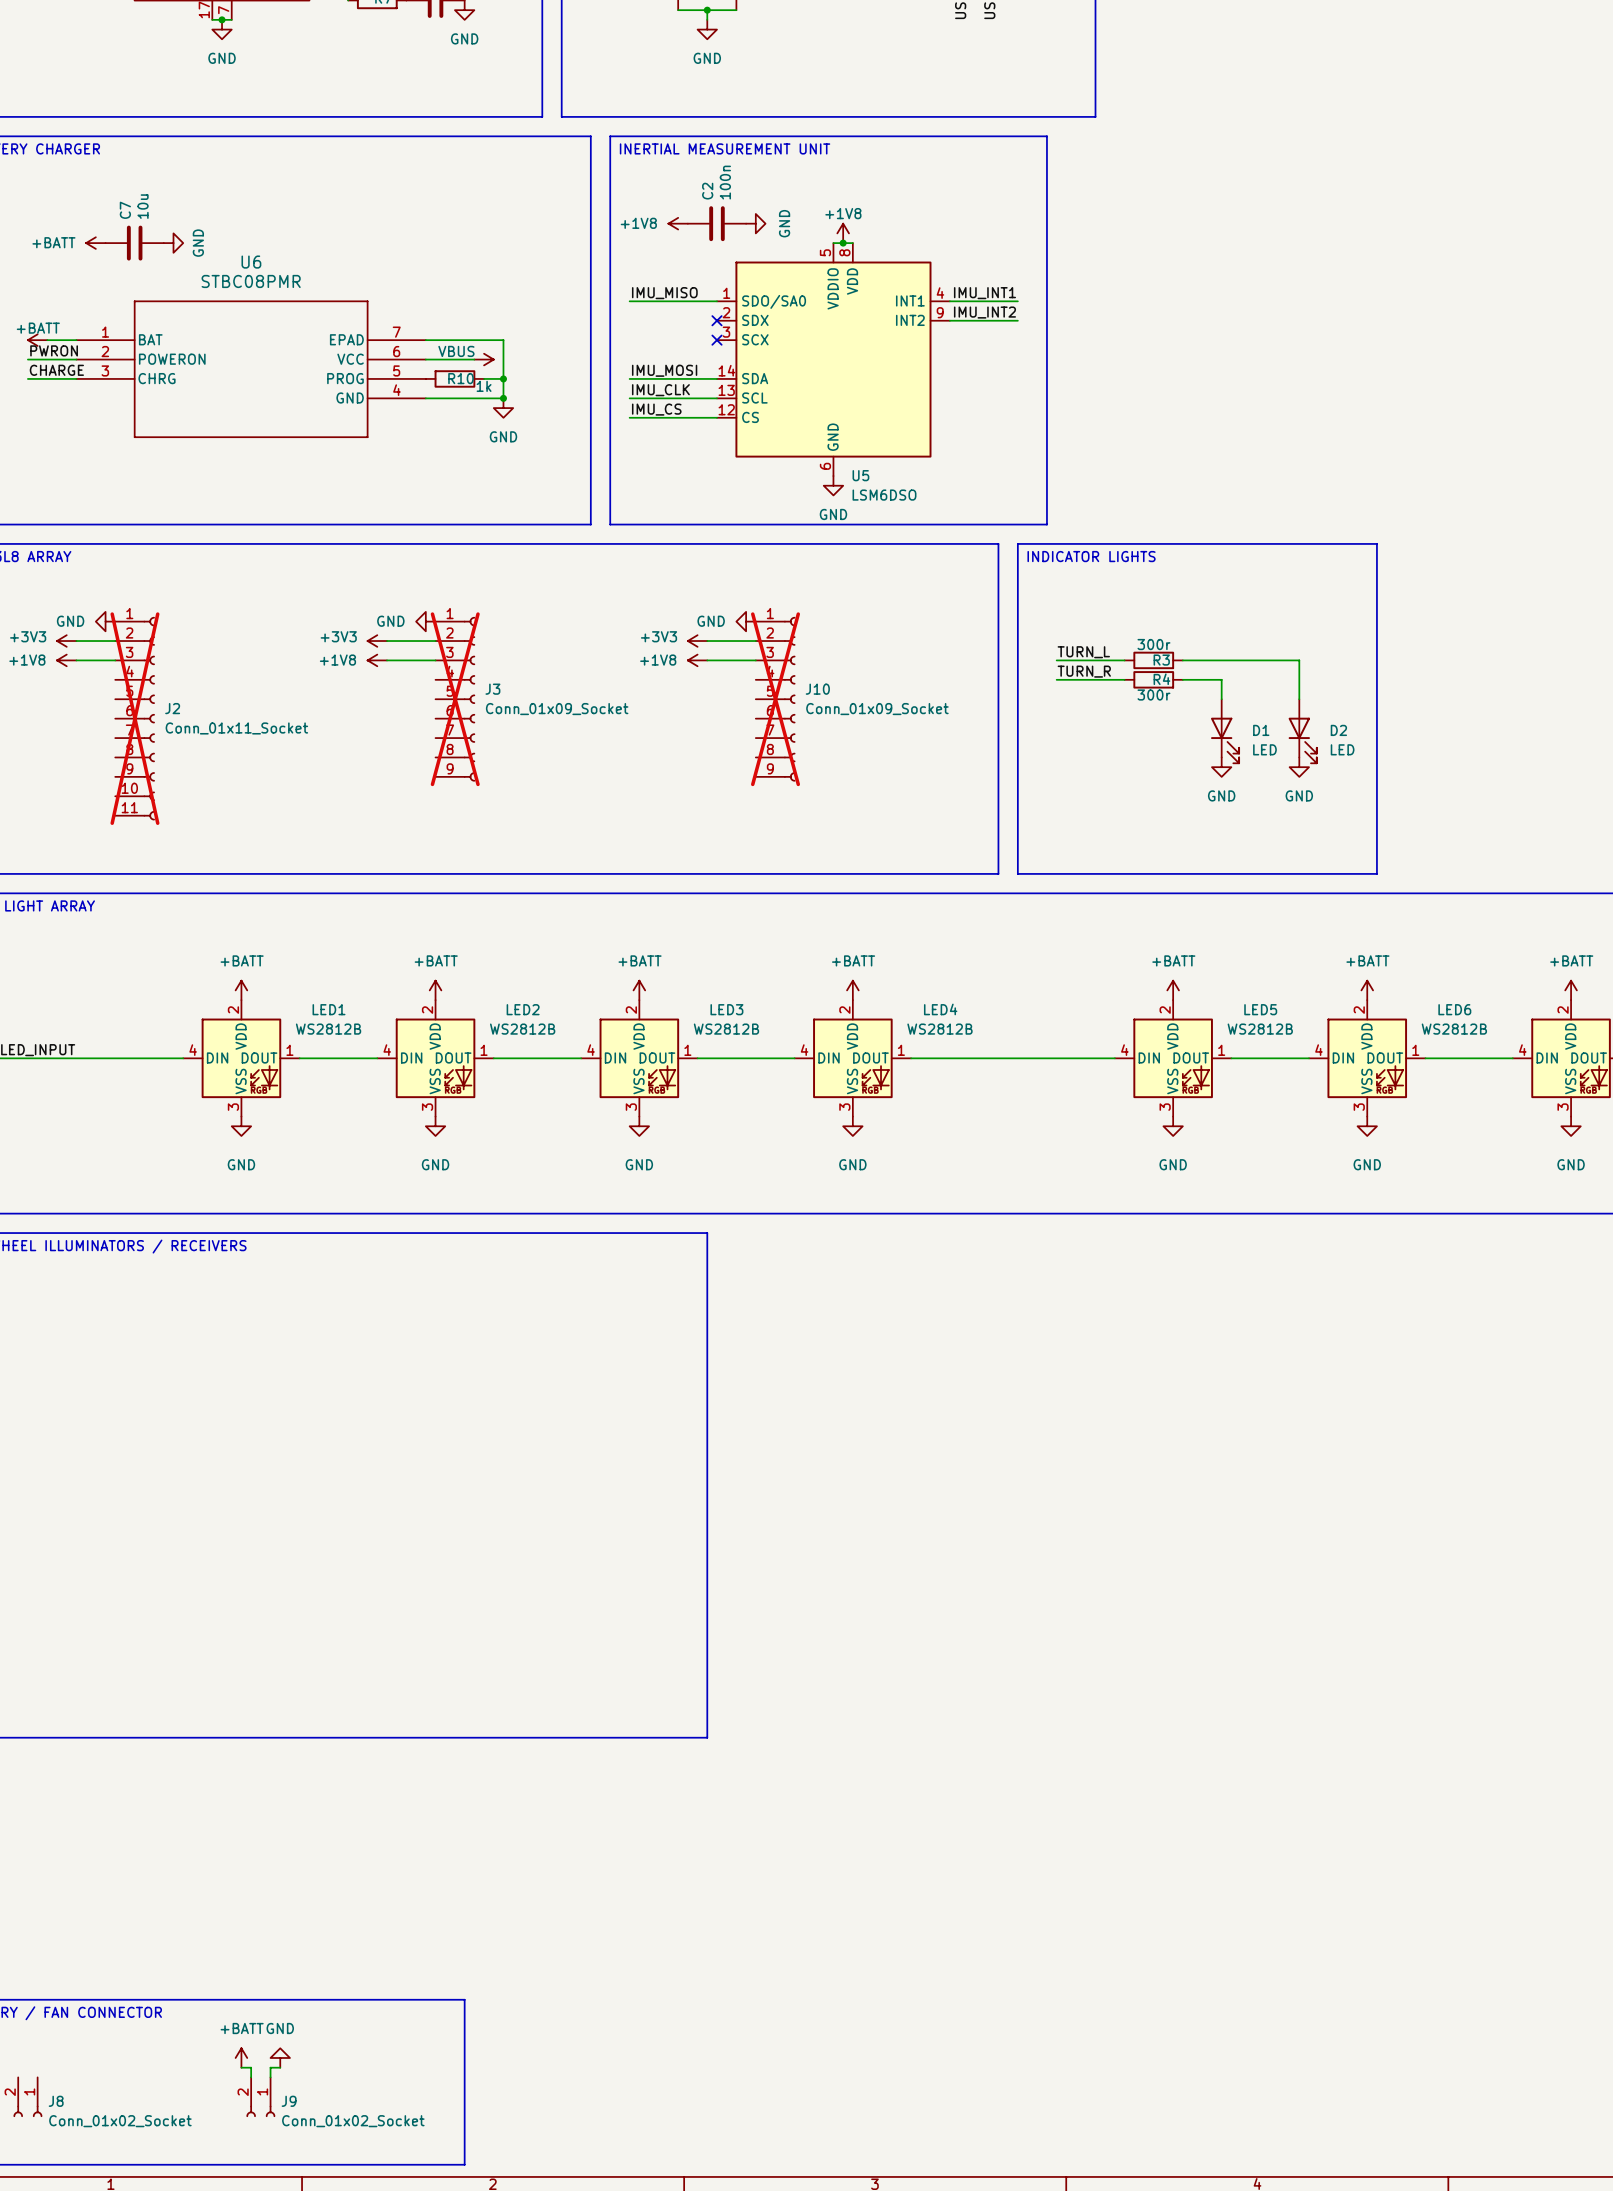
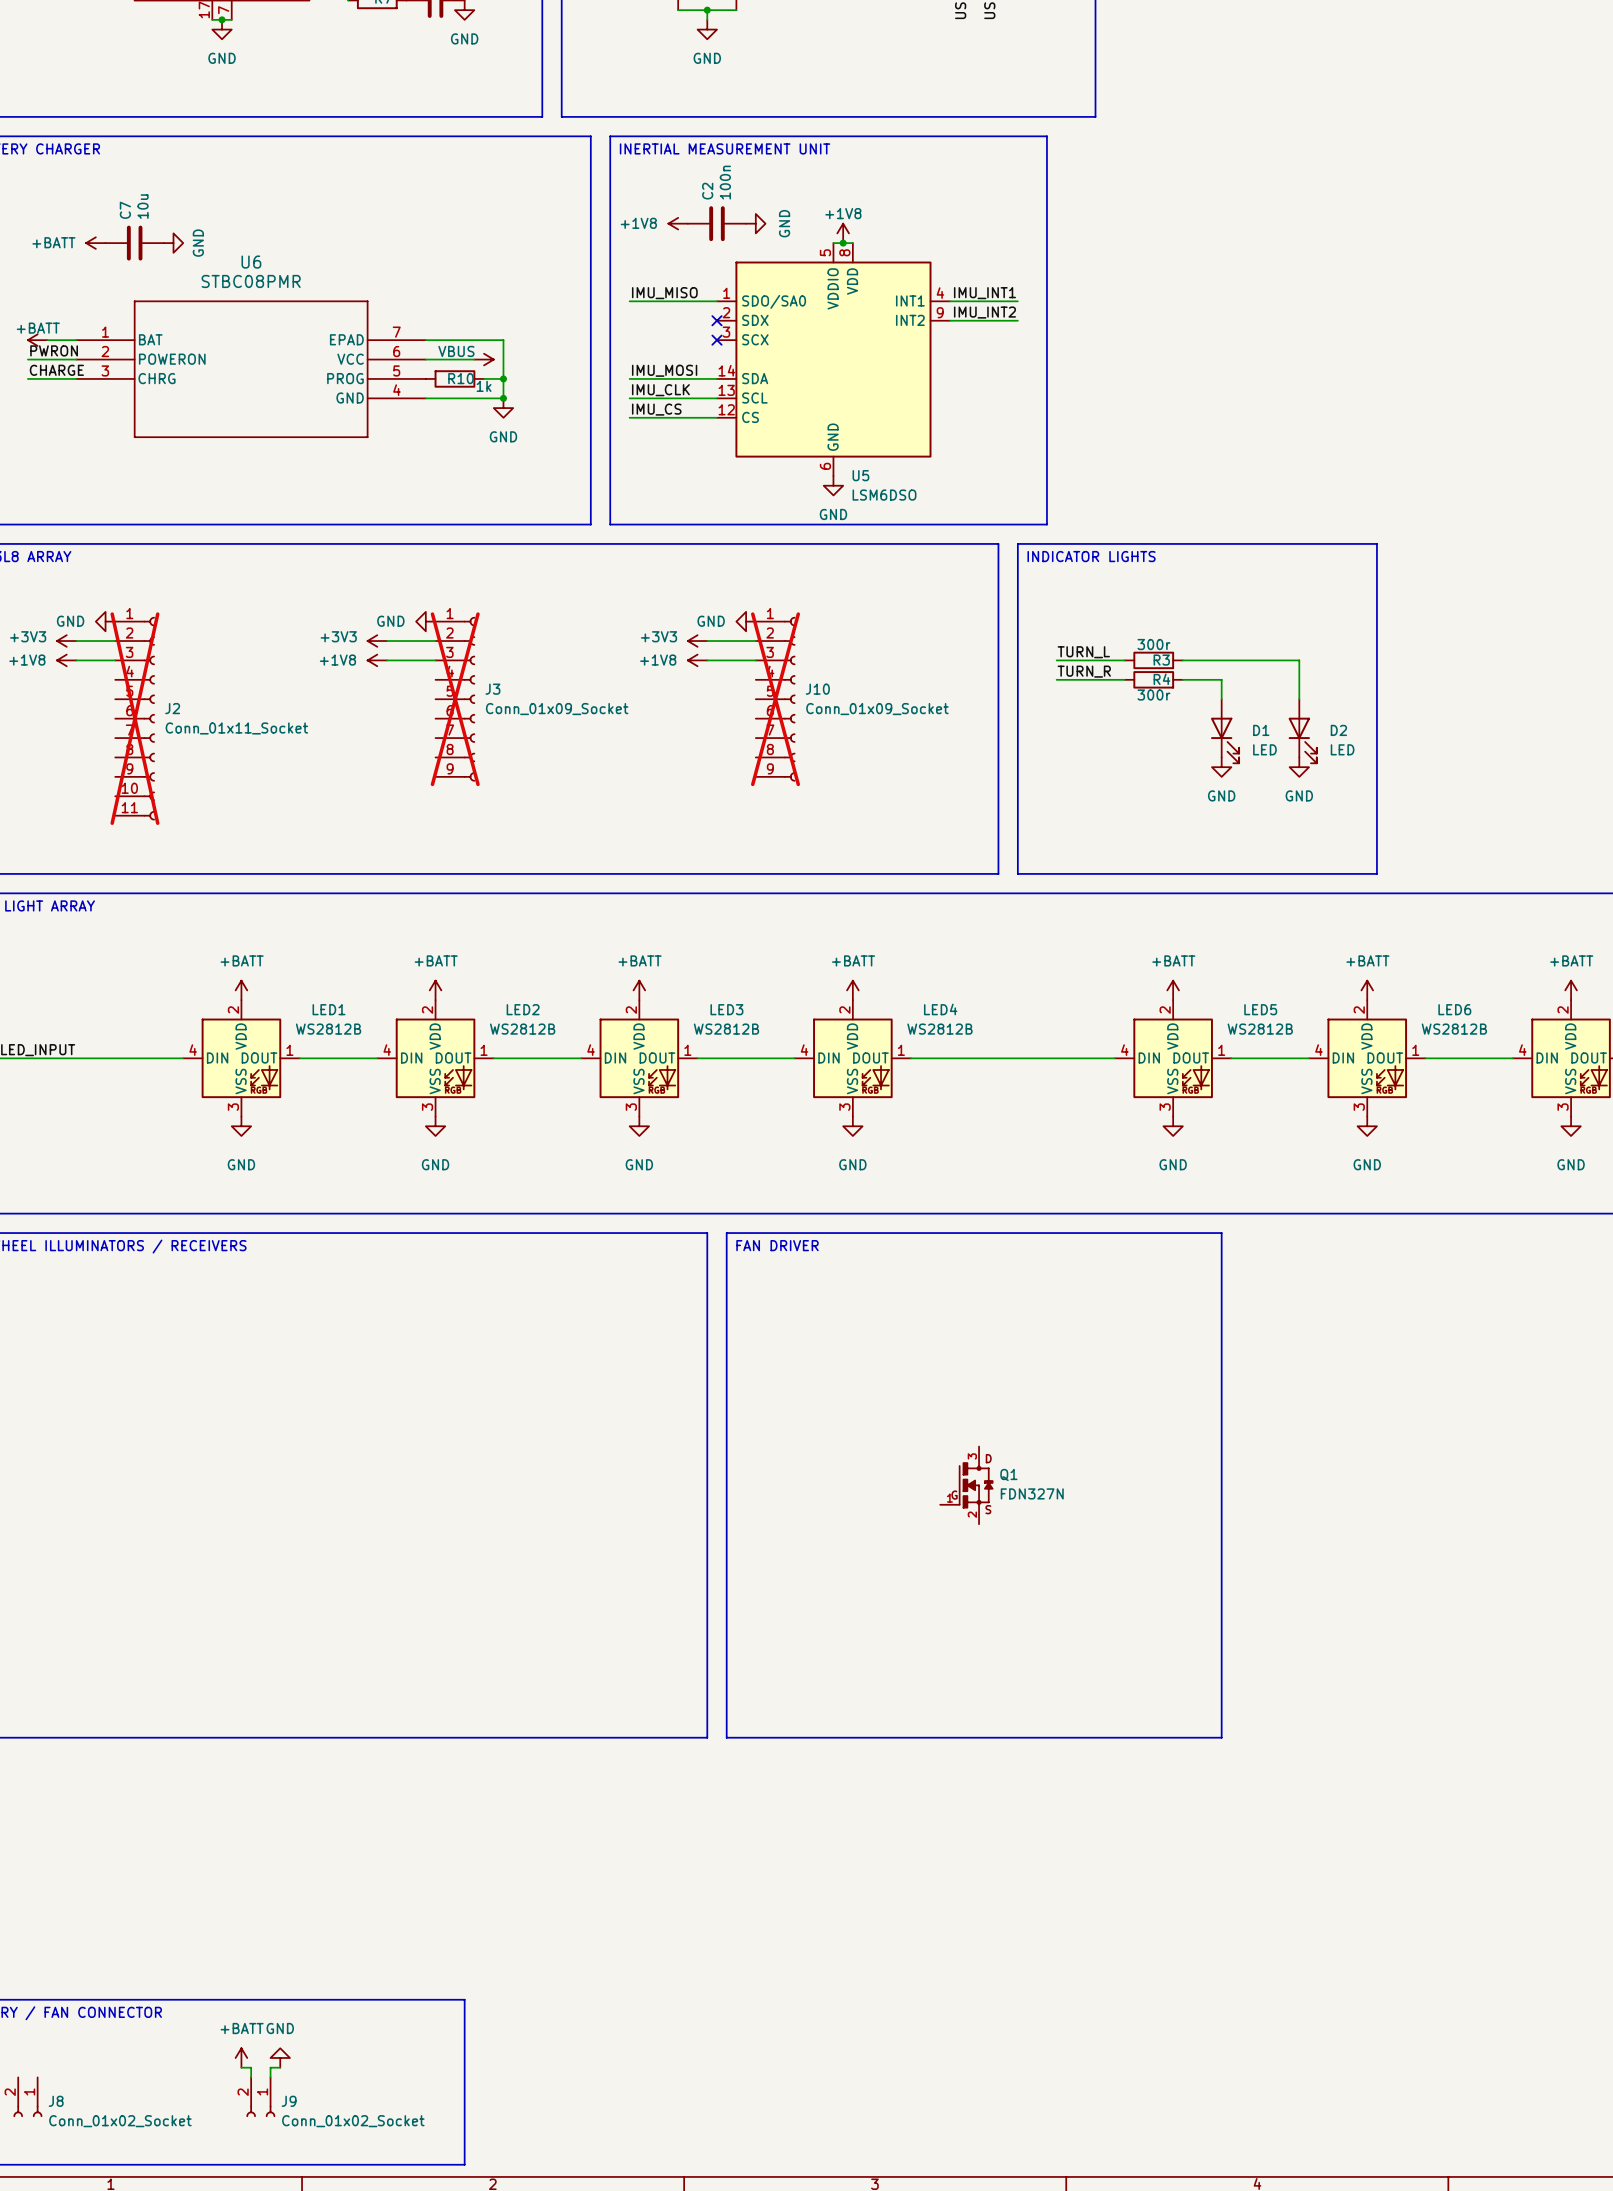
line: none -> (726, 1233) (1221, 1233) (1221, 1737) (726, 1737) (726, 1233)
text: none -> FAN DRIVER (777, 1245)
Q1: none -> FDN327N (966, 1485)

